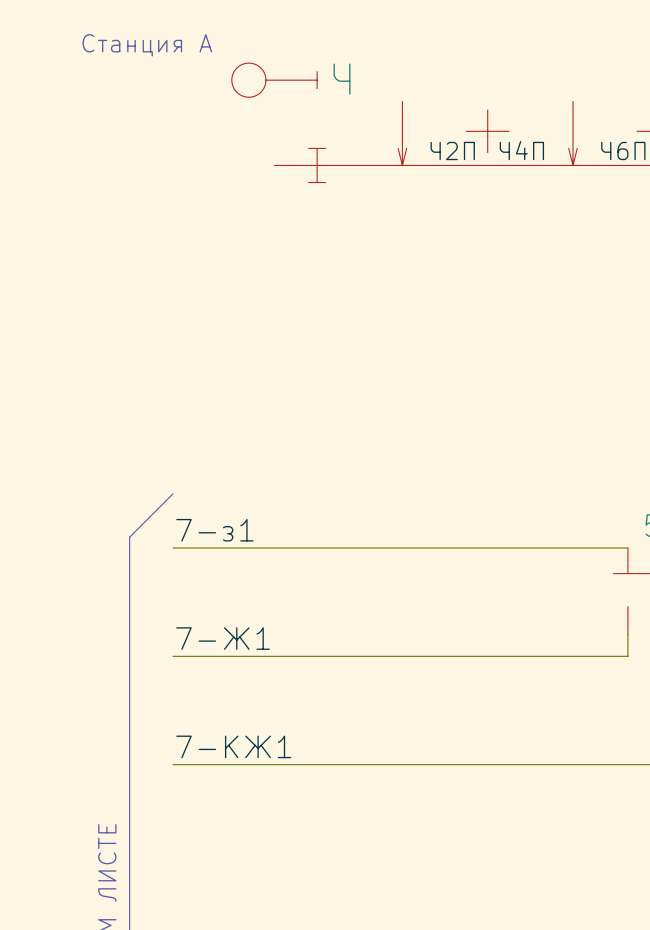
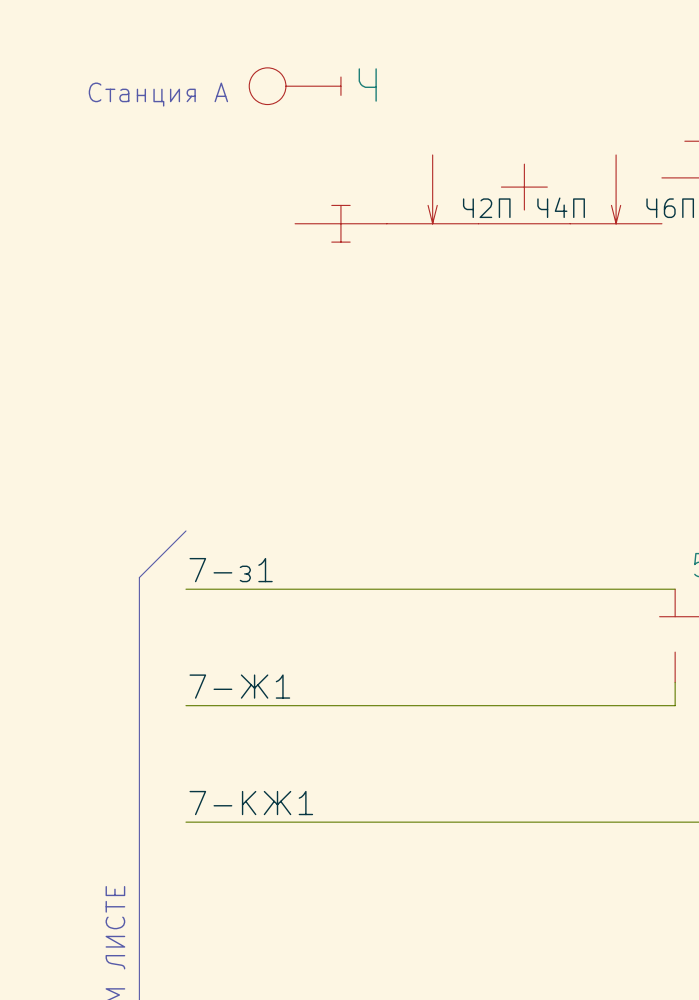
text position: Станция А (147, 45) -> Станция А (158, 94)
part position: (402, 133) -> (432, 189)
part position: (573, 133) -> (616, 189)
part position: (487, 137) -> (524, 193)
label position: Ч2П (452, 150) -> Ч2П (486, 208)
label position: Ч4П (521, 150) -> Ч4П (561, 207)
label position: Ч6П (623, 150) -> Ч6П (670, 208)
part position: (317, 165) -> (340, 223)

